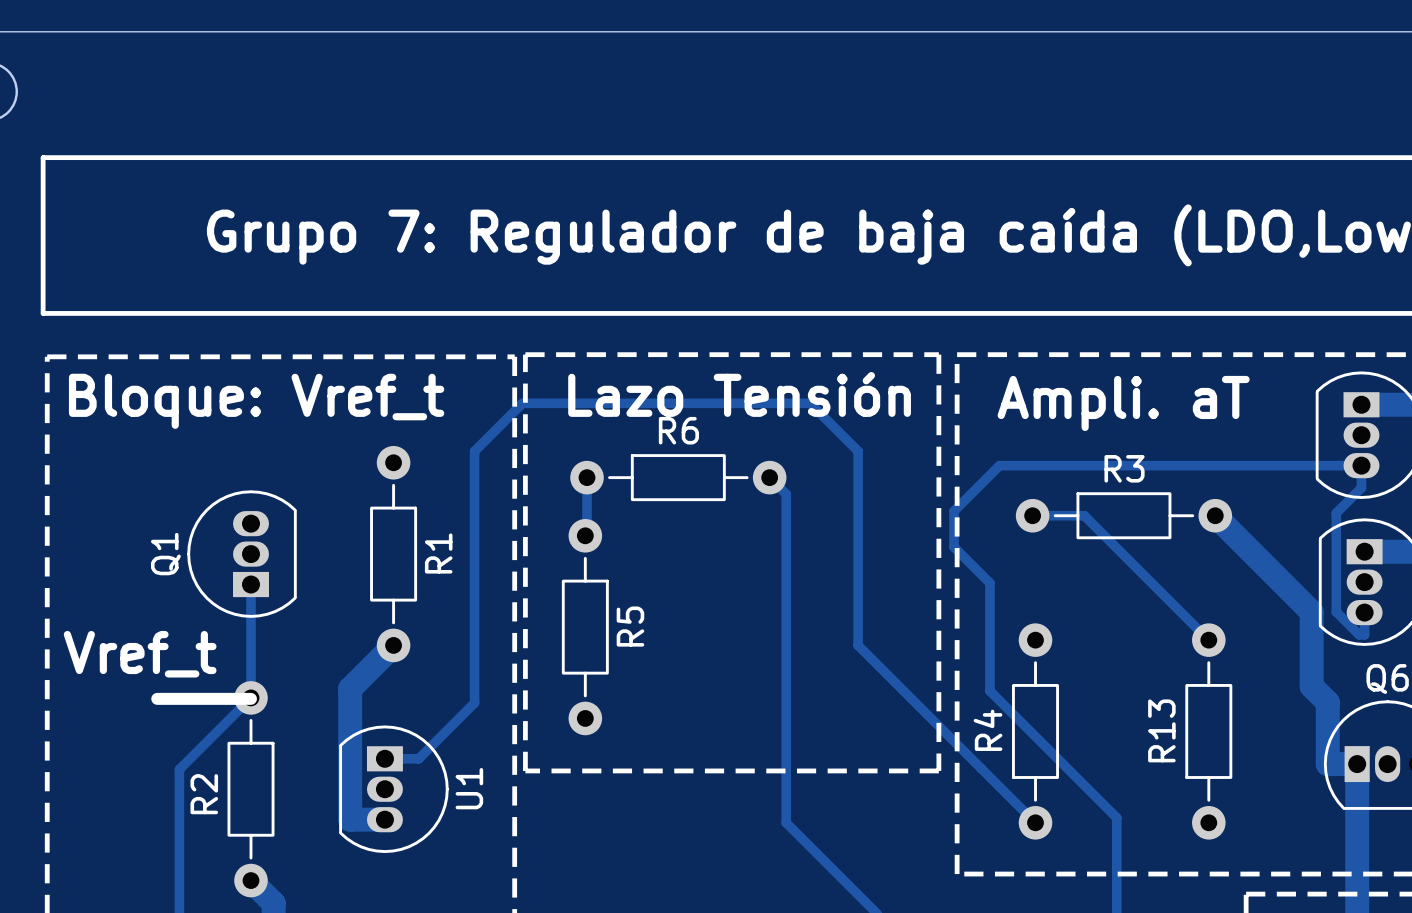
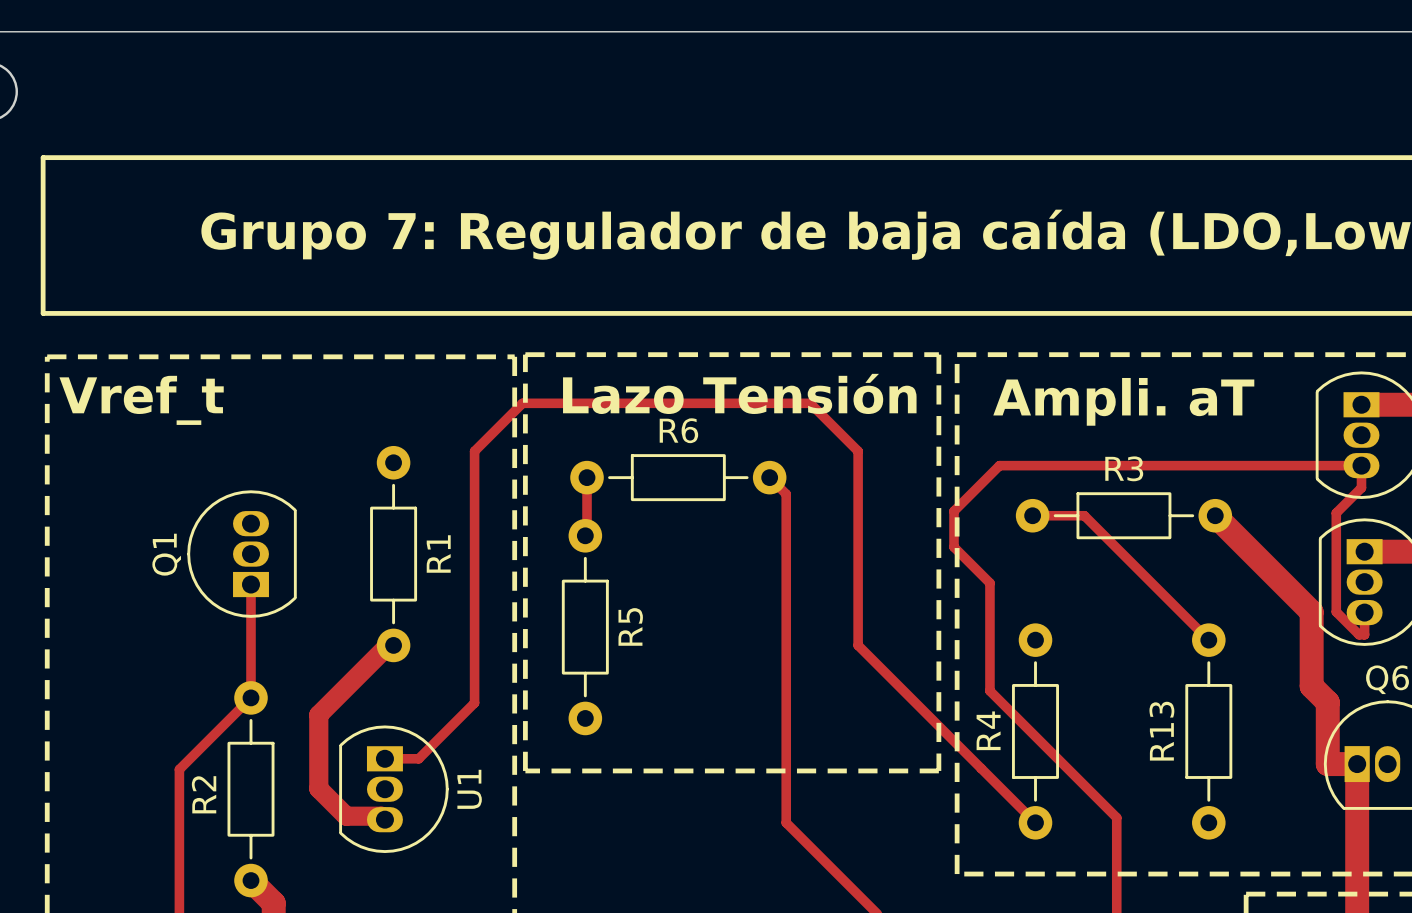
text: Bloque: Vref_t (256, 401) -> Vref_t (141, 400)
track: (393, 645) (350, 688) (350, 819) (384, 819) -> (393, 645) (388, 645) (318, 714) (318, 788) (346, 816) (381, 816) (384, 819)
text: Vref_t (140, 654) -> none
line: (157, 698) (250, 698) -> none

